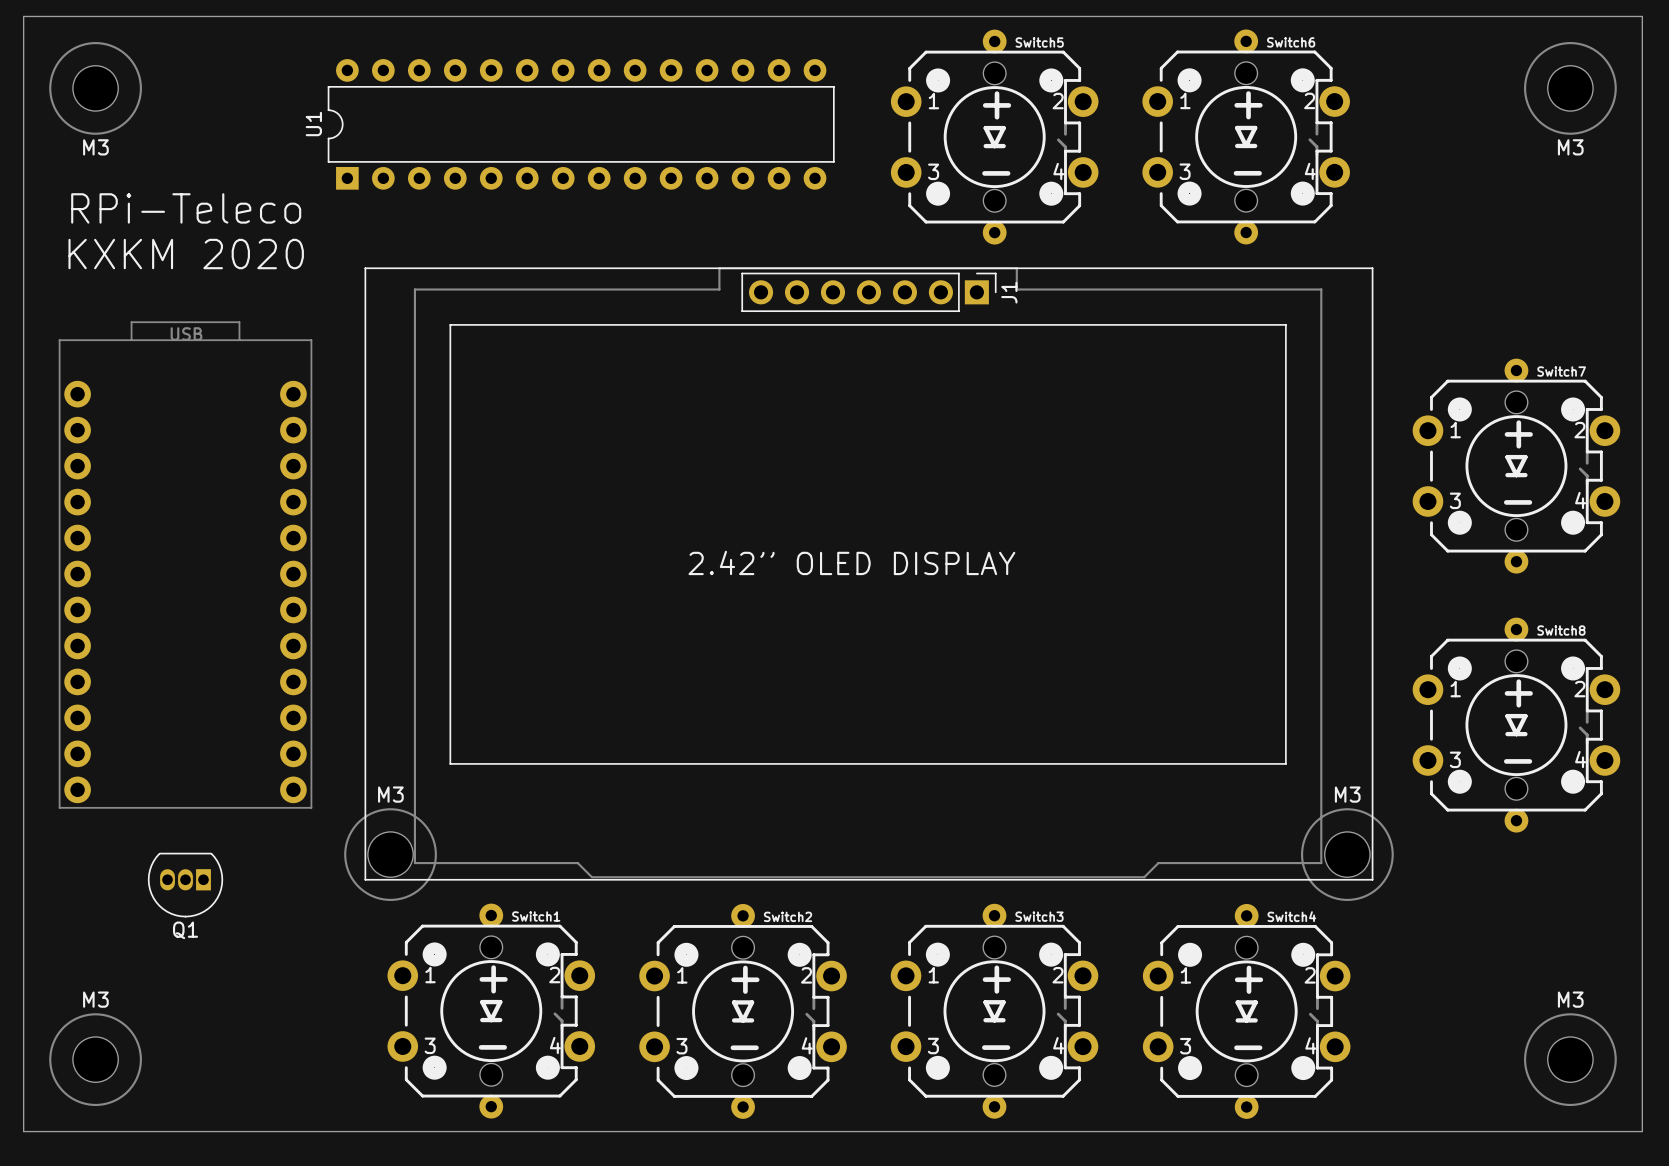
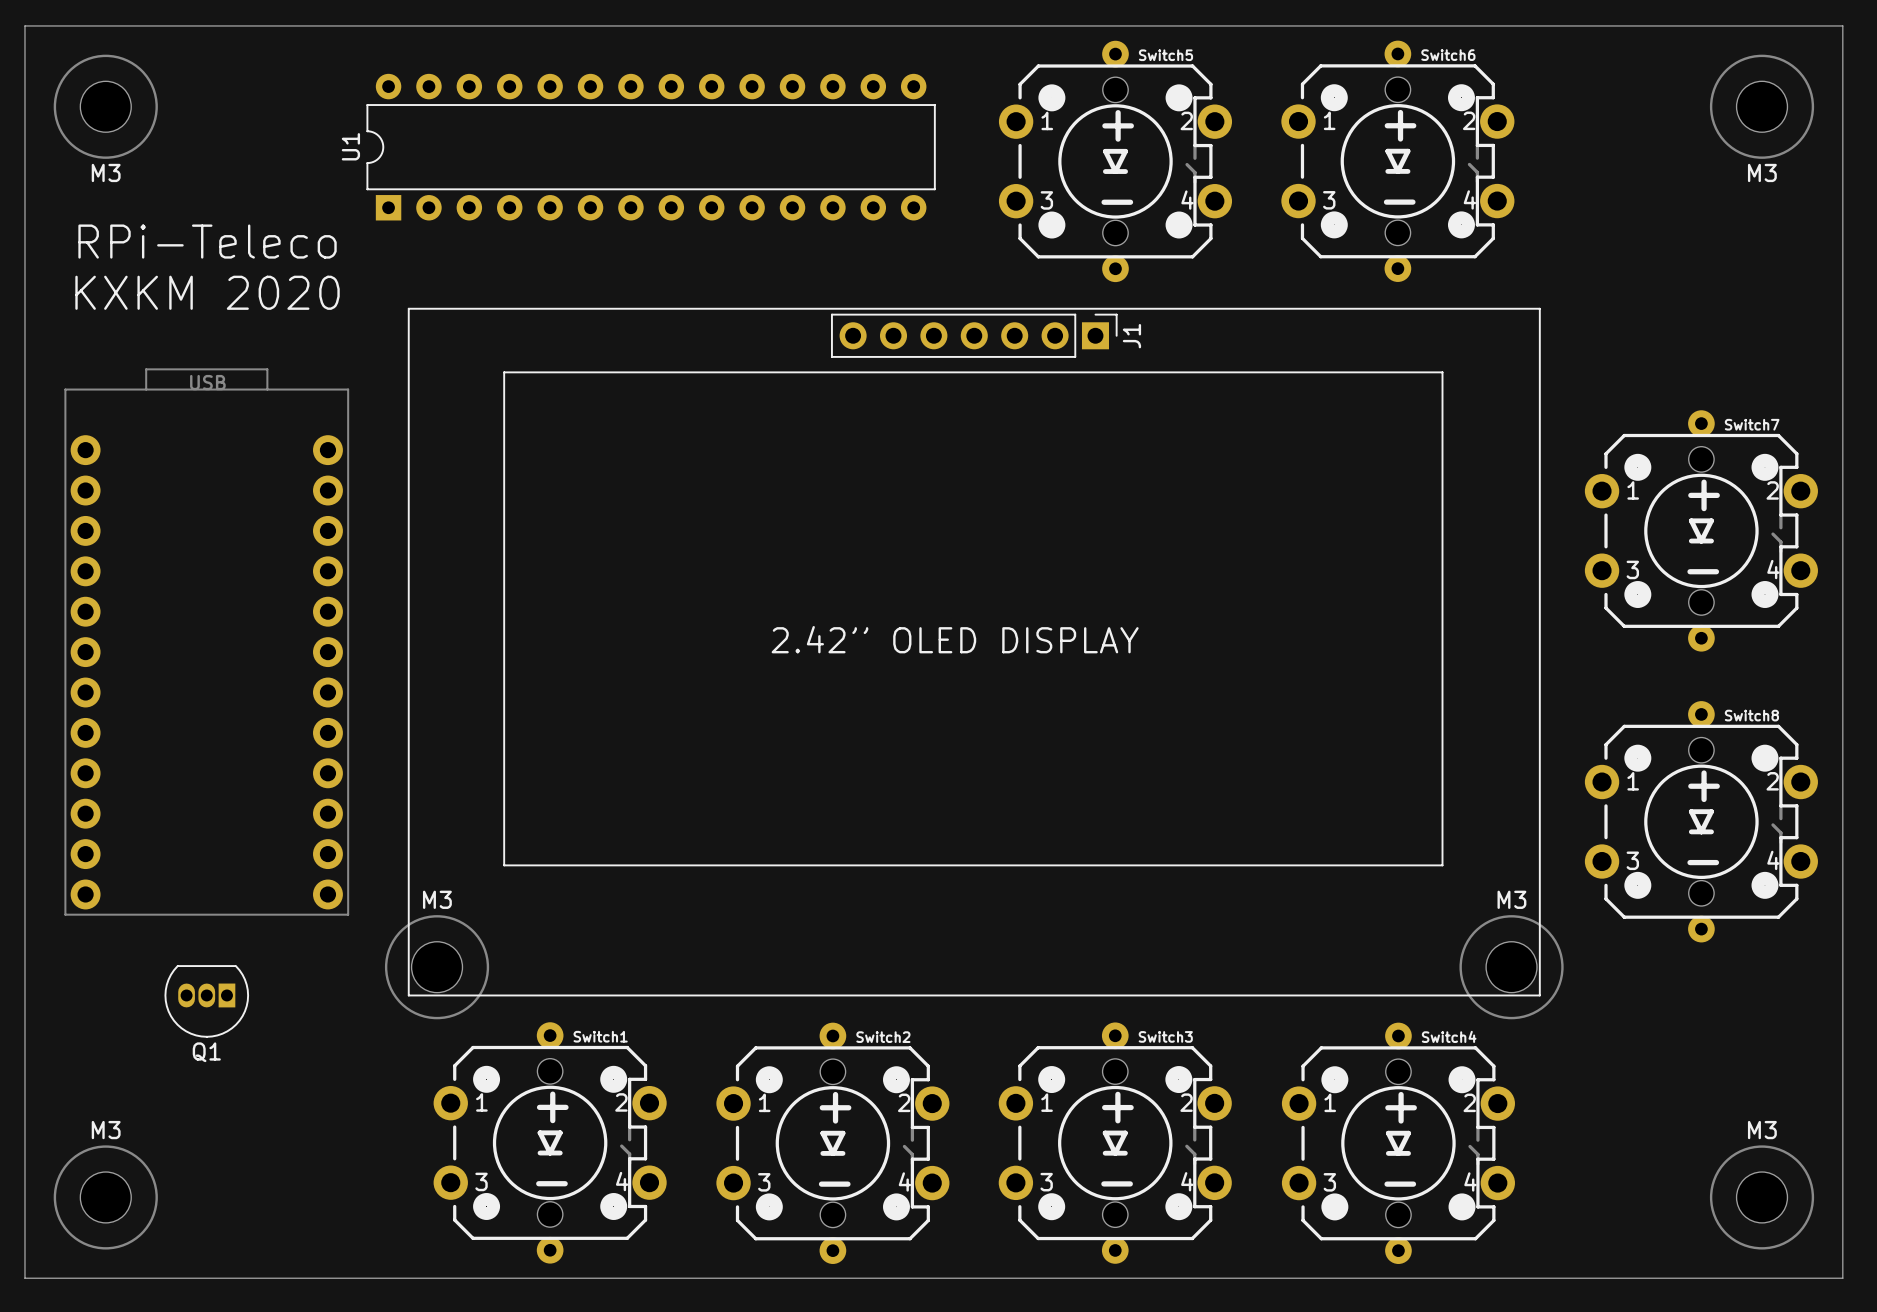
line: (719, 268) (1016, 268) (1016, 289) (1321, 289) (1321, 863) (1158, 863) (1144, 877) (591, 877) (577, 863) (414, 863) (414, 289) (719, 289) (719, 268) -> none

